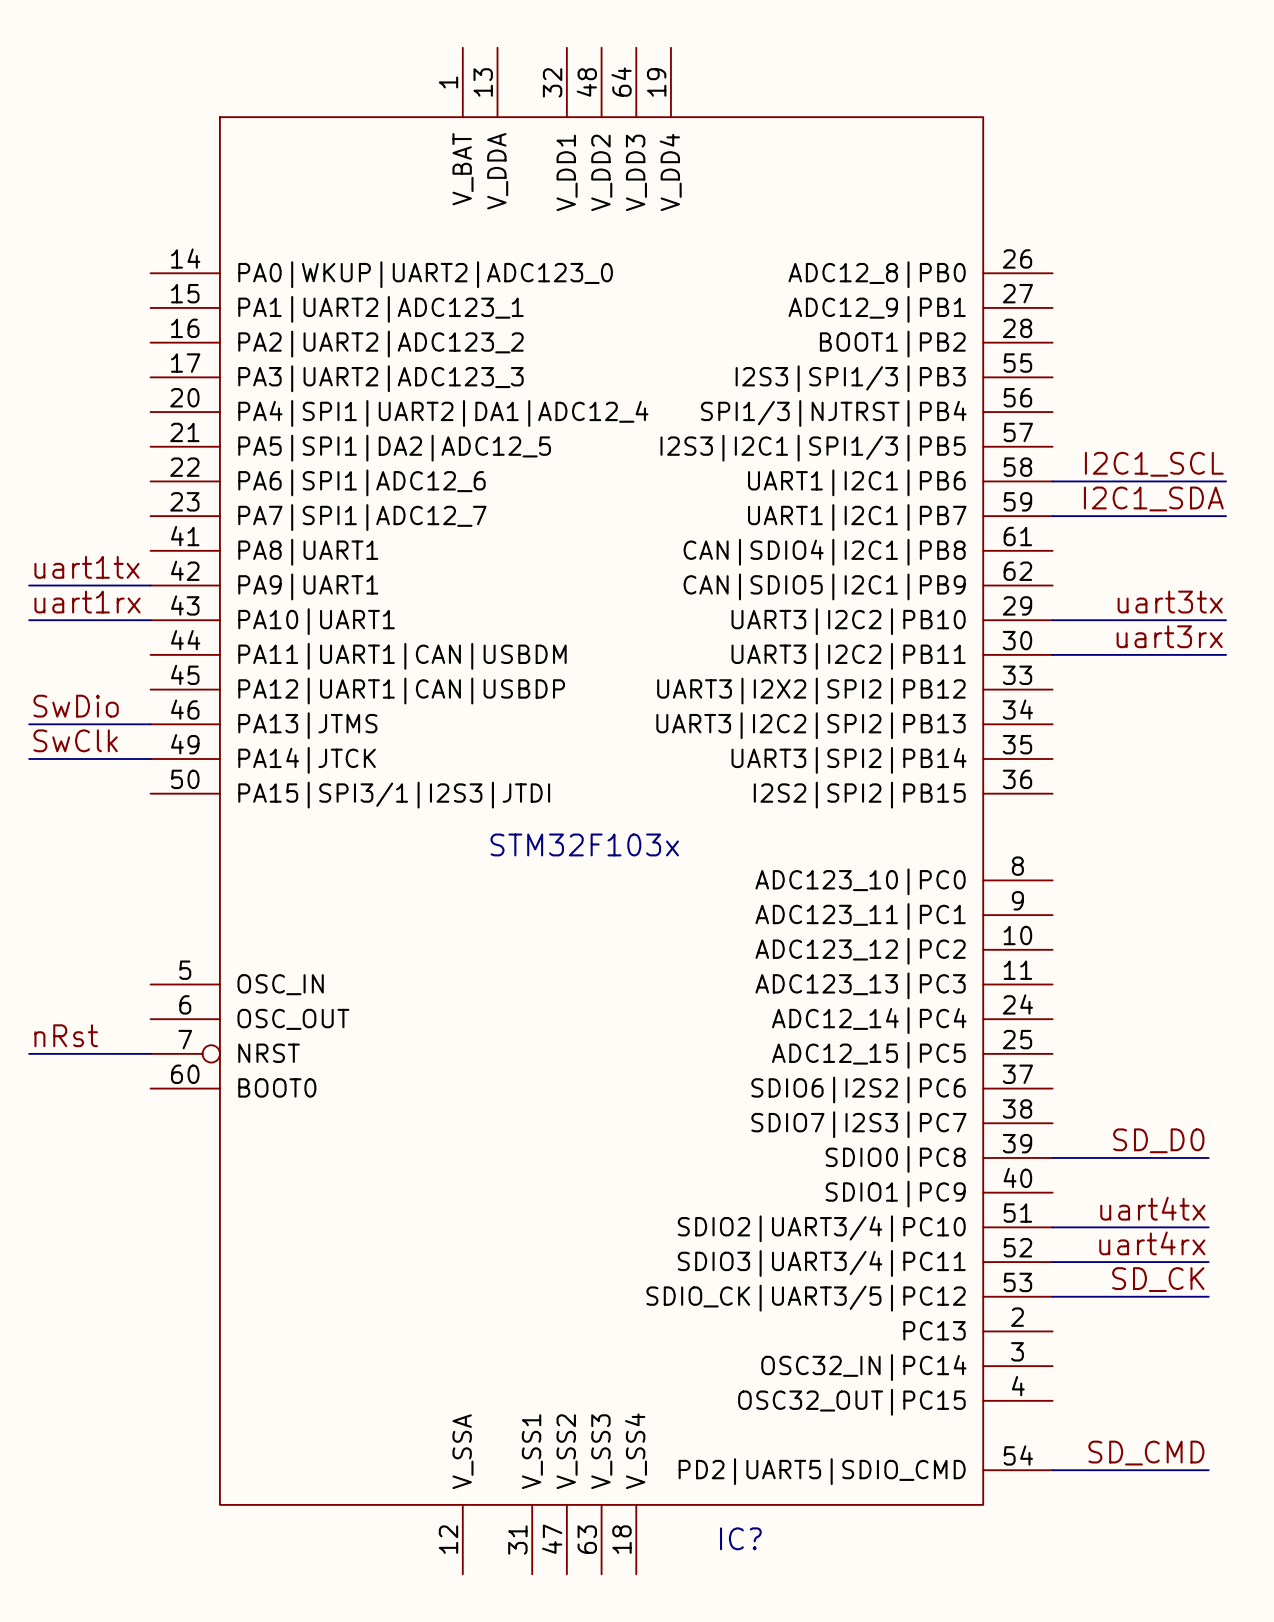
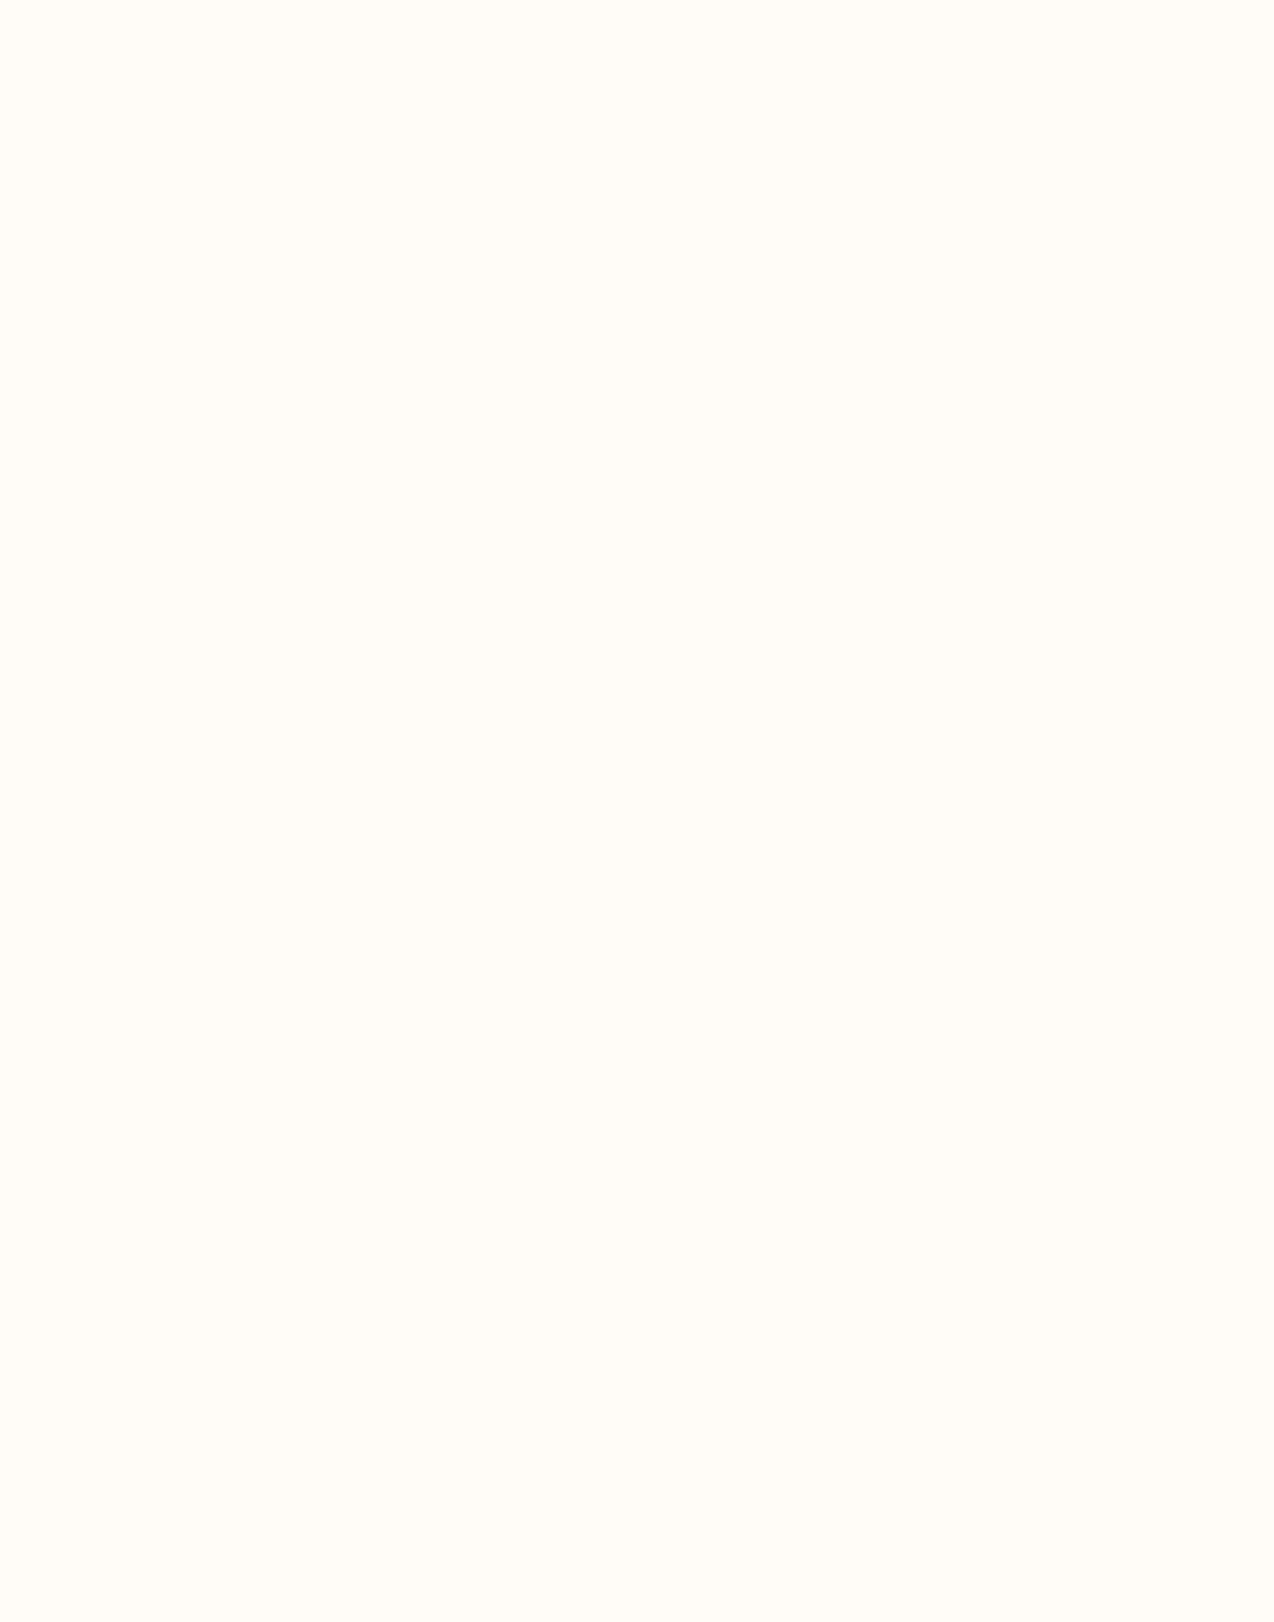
label: I2C1_SCL (1154, 464) -> none
wire: (1052, 481) (1226, 481) -> none
label: I2C1_SDA (1153, 498) -> none
wire: (1052, 516) (1226, 516) -> none
label: uart1tx (87, 567) -> none
wire: (29, 585) (150, 585) -> none
label: uart1rx (87, 602) -> none
label: uart3tx (1170, 602) -> none
wire: (29, 620) (150, 620) -> none
wire: (1052, 620) (1226, 620) -> none
label: uart3rx (1169, 636) -> none
wire: (1052, 654) (1226, 654) -> none
label: SwDio (76, 706) -> none
wire: (29, 724) (150, 724) -> none
label: SwClk (75, 740) -> none
wire: (29, 758) (150, 758) -> none
IC?: STM32F103x (601, 811) -> none
label: nRst (66, 1035) -> none
wire: (29, 1053) (150, 1053) -> none
label: SD_D0 (1158, 1140) -> none
wire: (1052, 1157) (1208, 1157) -> none
label: uart4tx (1152, 1208) -> none
wire: (1052, 1227) (1208, 1227) -> none
label: uart4rx (1152, 1243) -> none
wire: (1052, 1262) (1208, 1262) -> none
label: SD_CK (1158, 1279) -> none
wire: (1052, 1296) (1208, 1296) -> none
label: SD_CMD (1146, 1453) -> none
wire: (1052, 1470) (1208, 1470) -> none

